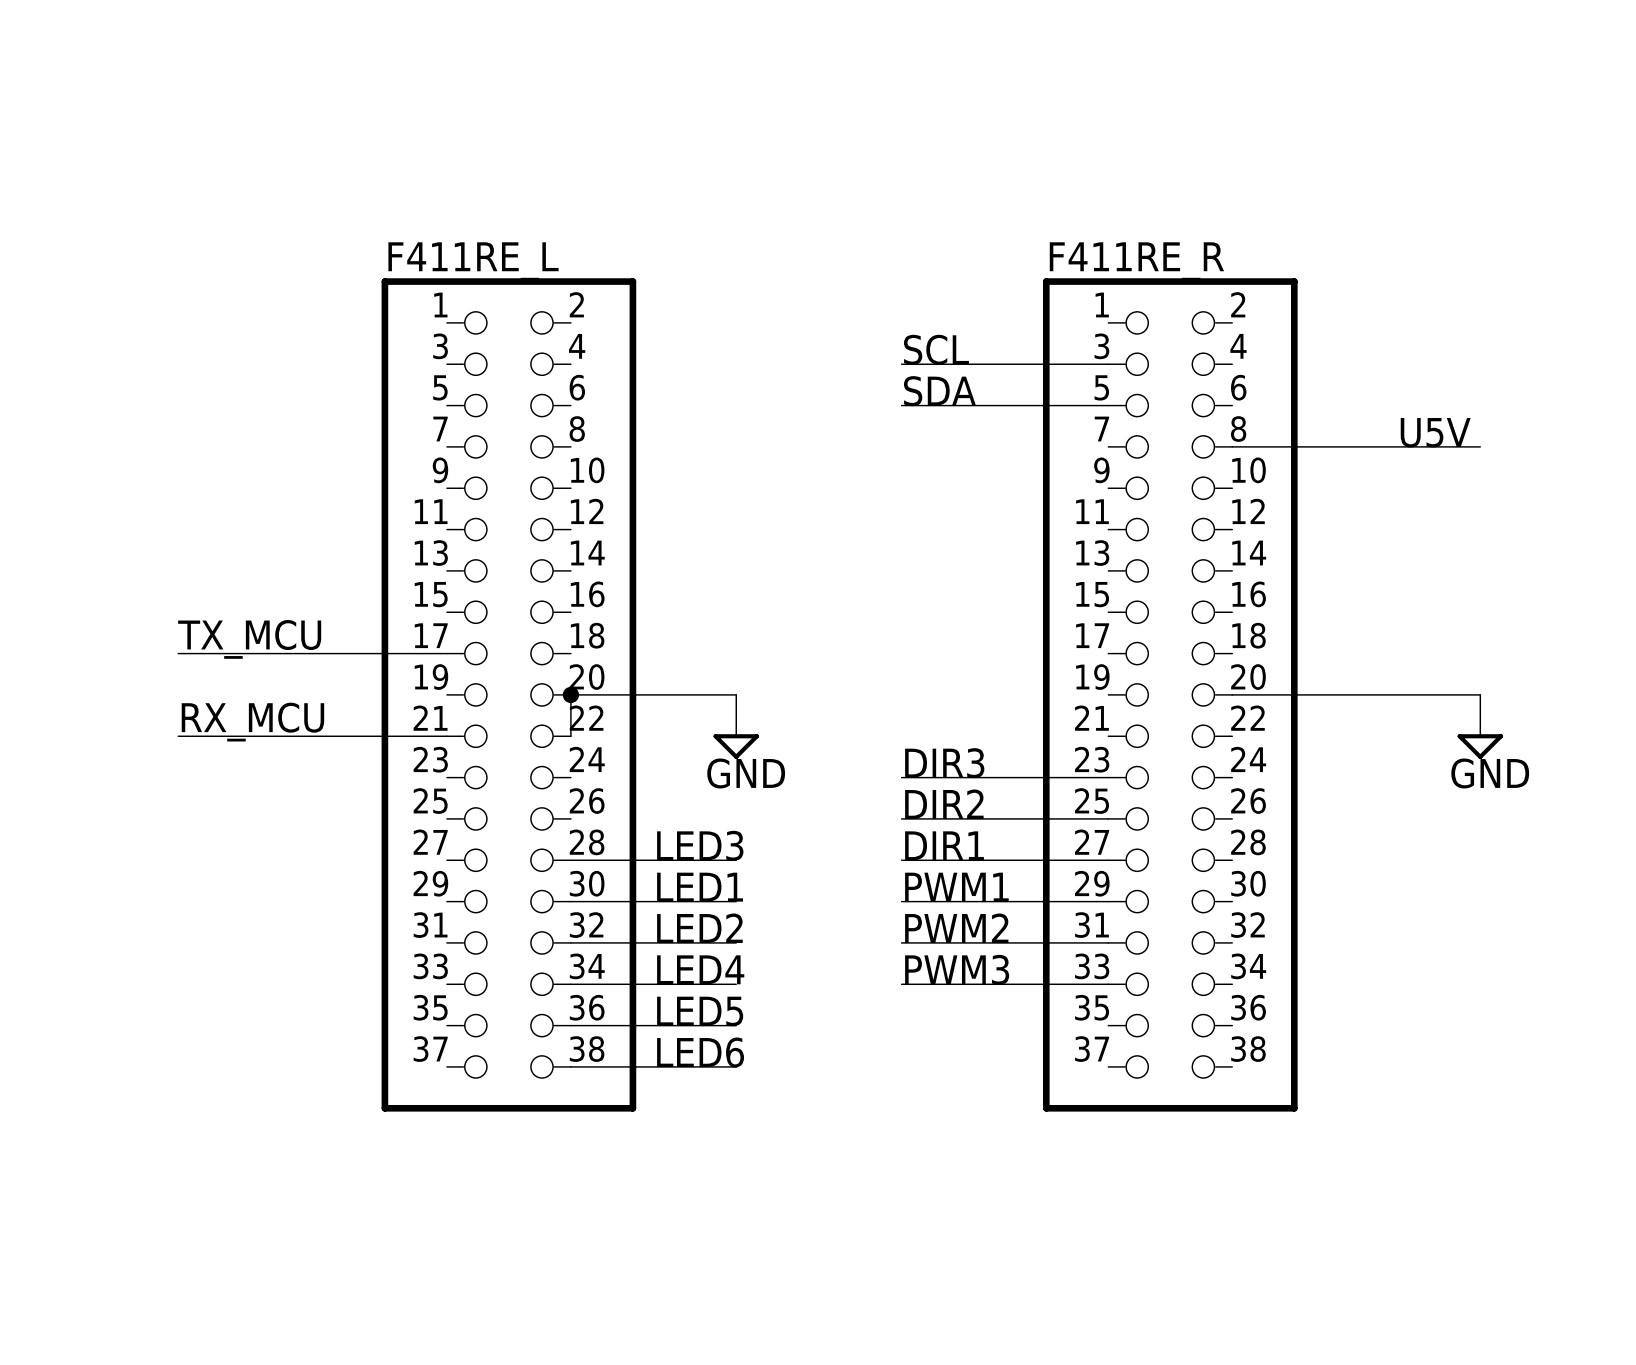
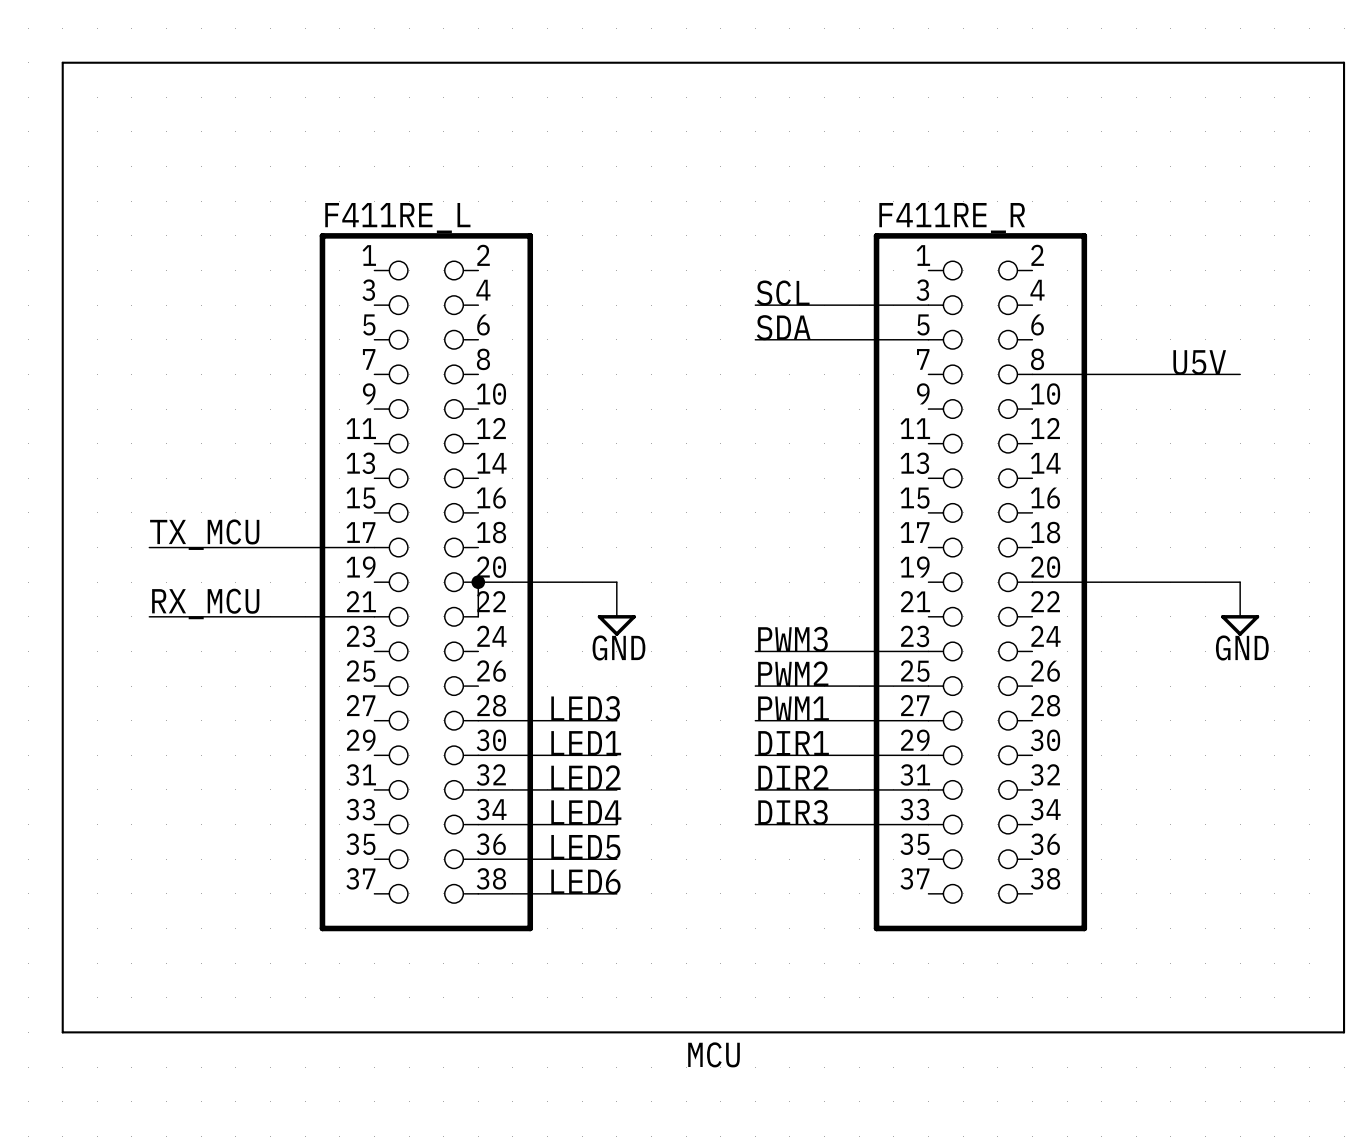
line: none -> (62, 62) (62, 1032) (1344, 1032) (1344, 62) (62, 62)
label: DIR3 (944, 763) -> PWM3 (792, 639)
label: DIR2 (944, 804) -> PWM2 (793, 673)
label: DIR1 (944, 845) -> PWM1 (793, 708)
label: PWM1 (956, 887) -> DIR1 (793, 743)
label: PWM2 (956, 928) -> DIR2 (793, 777)
label: PWM3 (957, 969) -> DIR3 (793, 812)
text: none -> MCU (714, 1054)

